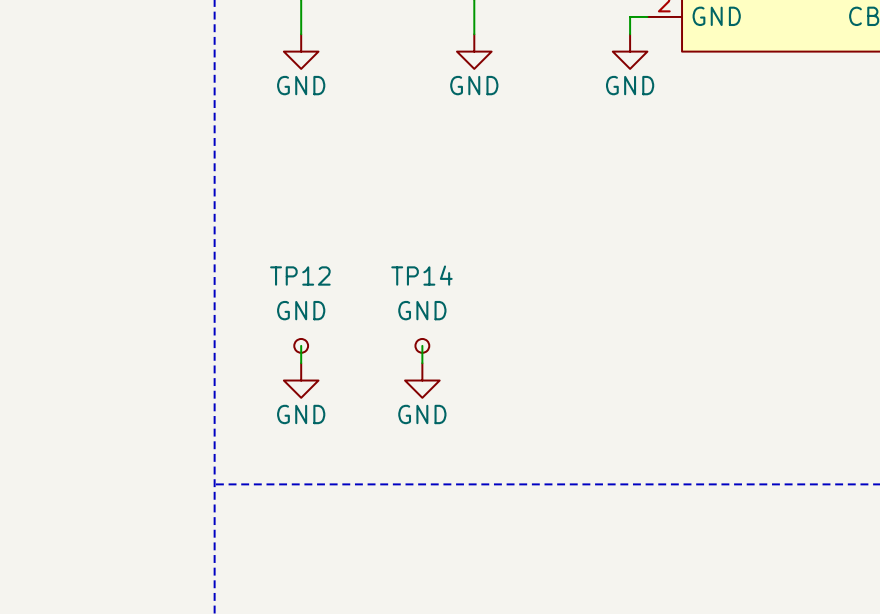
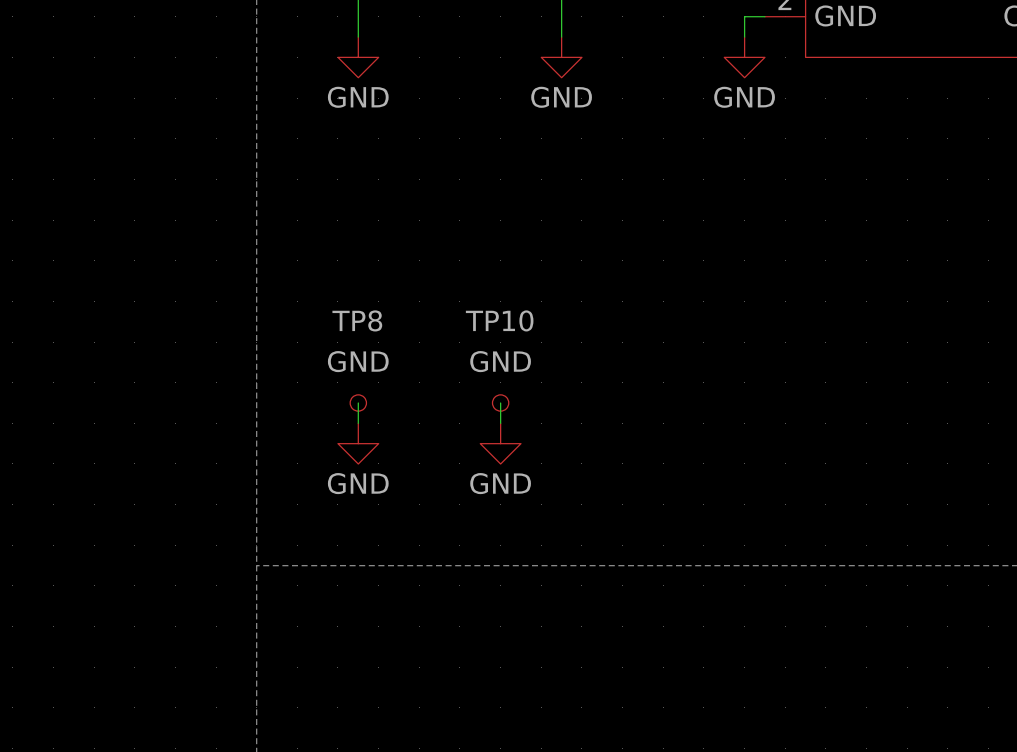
TP14 name: TP14 (421, 275) -> TP10 (499, 320)
TP12 name: TP12 (300, 276) -> TP8 (357, 320)

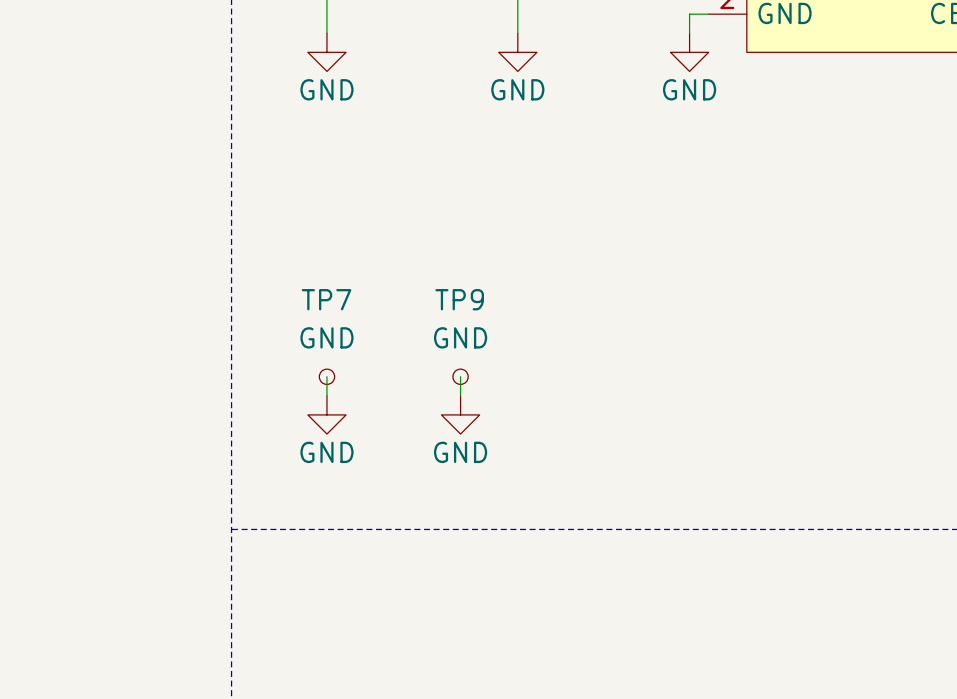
TP8 name: TP8 (357, 320) -> TP7 (326, 299)
TP10 name: TP10 (499, 320) -> TP9 (459, 299)

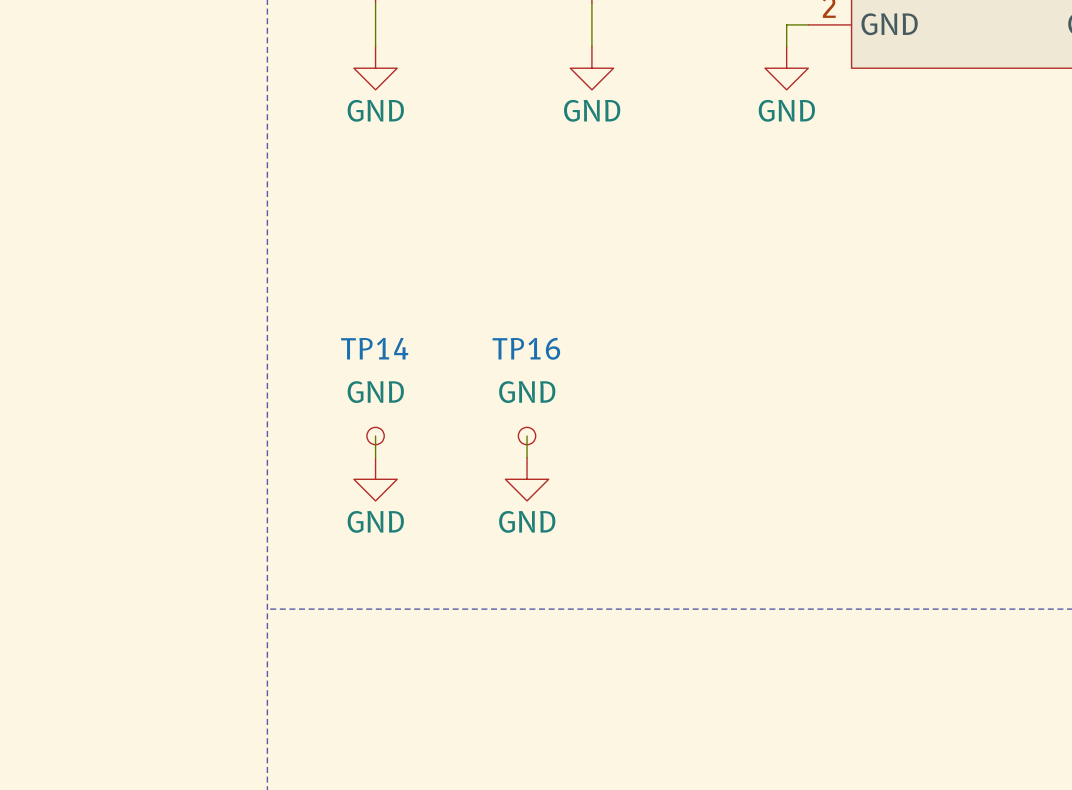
TP7 name: TP7 (326, 299) -> TP14 (374, 348)
TP9 name: TP9 (459, 299) -> TP16 (526, 348)

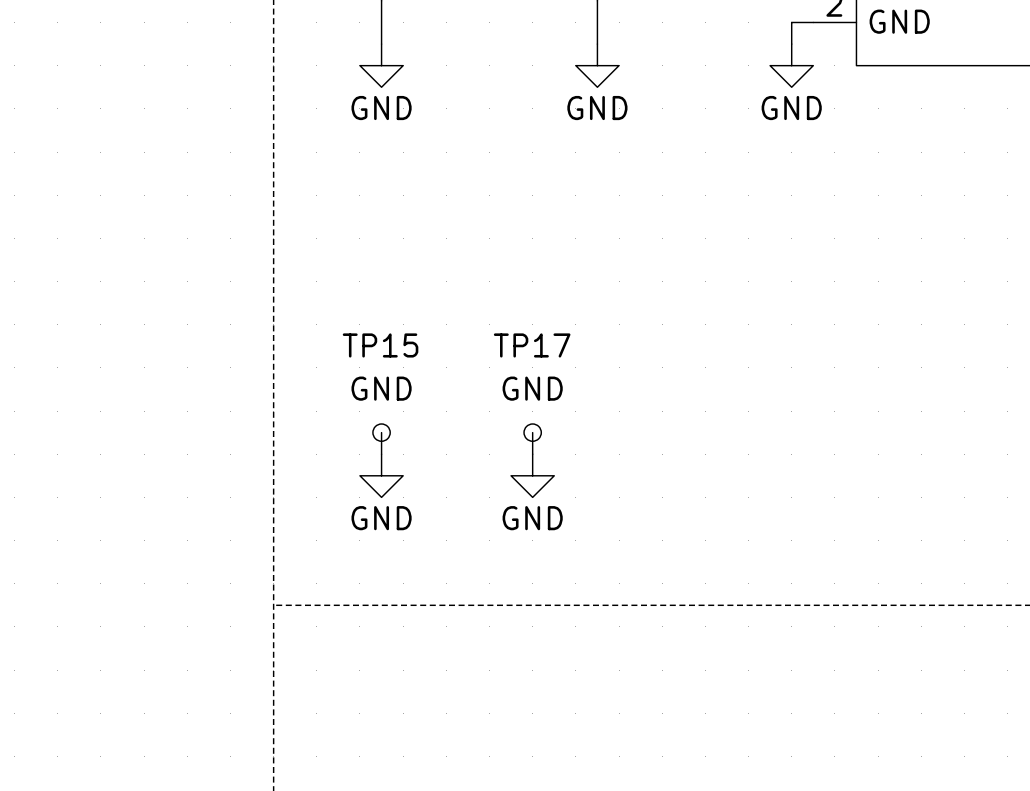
TP14 name: TP14 (374, 348) -> TP15 (380, 345)
TP16 name: TP16 (526, 348) -> TP17 (532, 345)

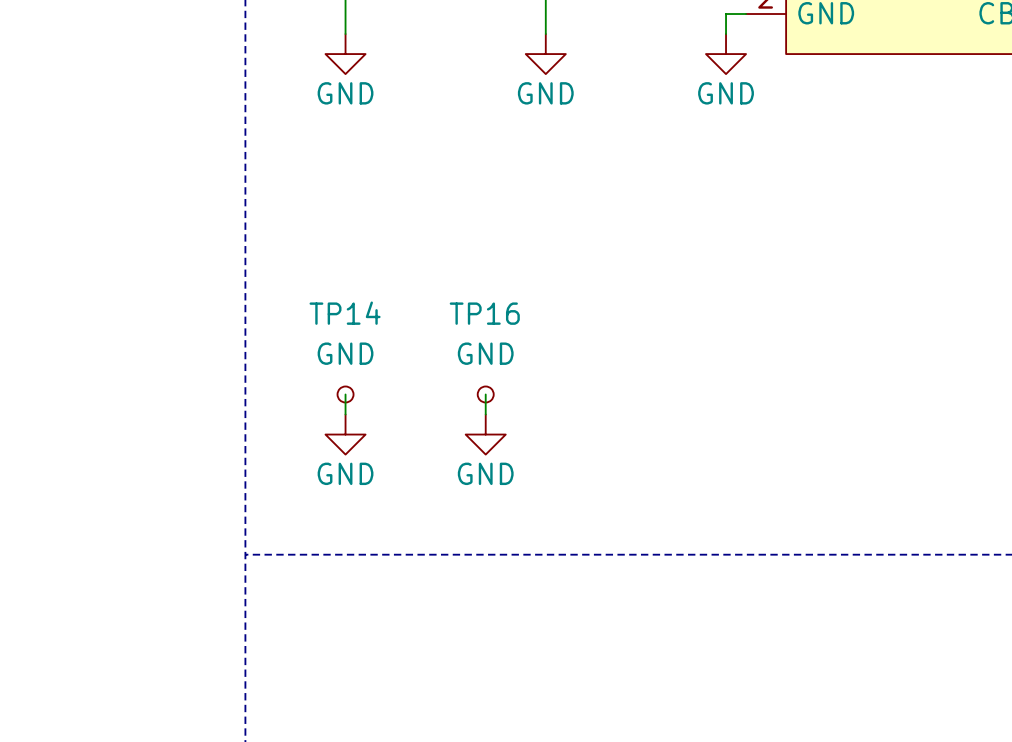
TP15 name: TP15 (380, 345) -> TP14 (345, 313)
TP17 name: TP17 (532, 345) -> TP16 (484, 313)

